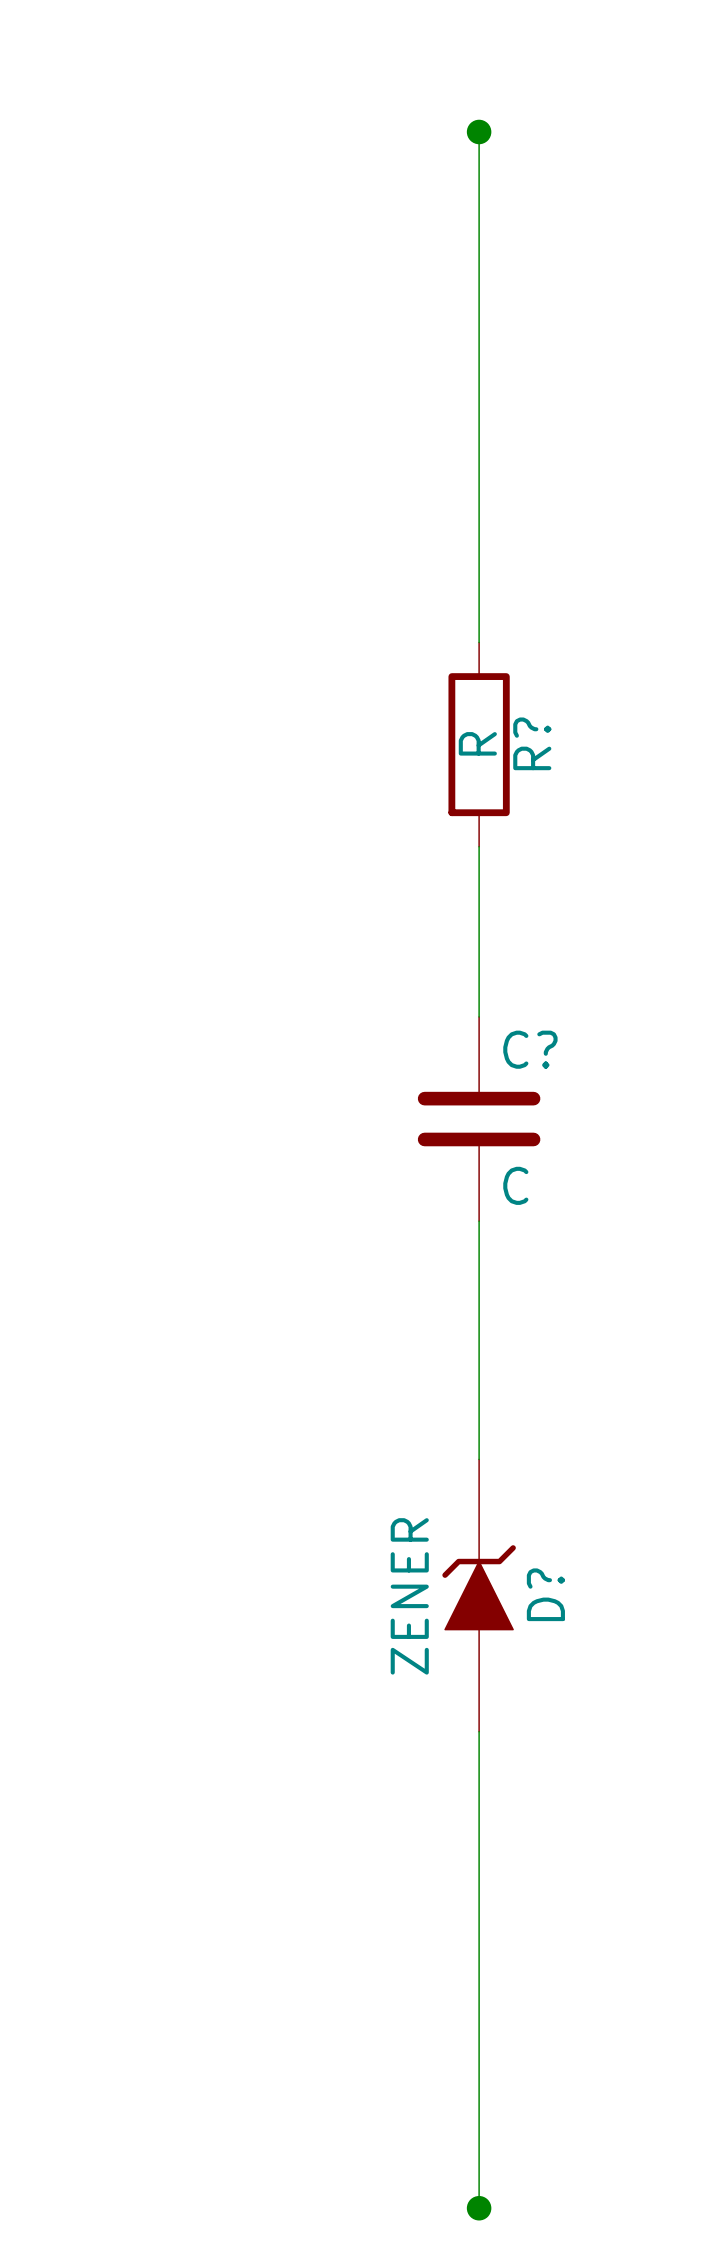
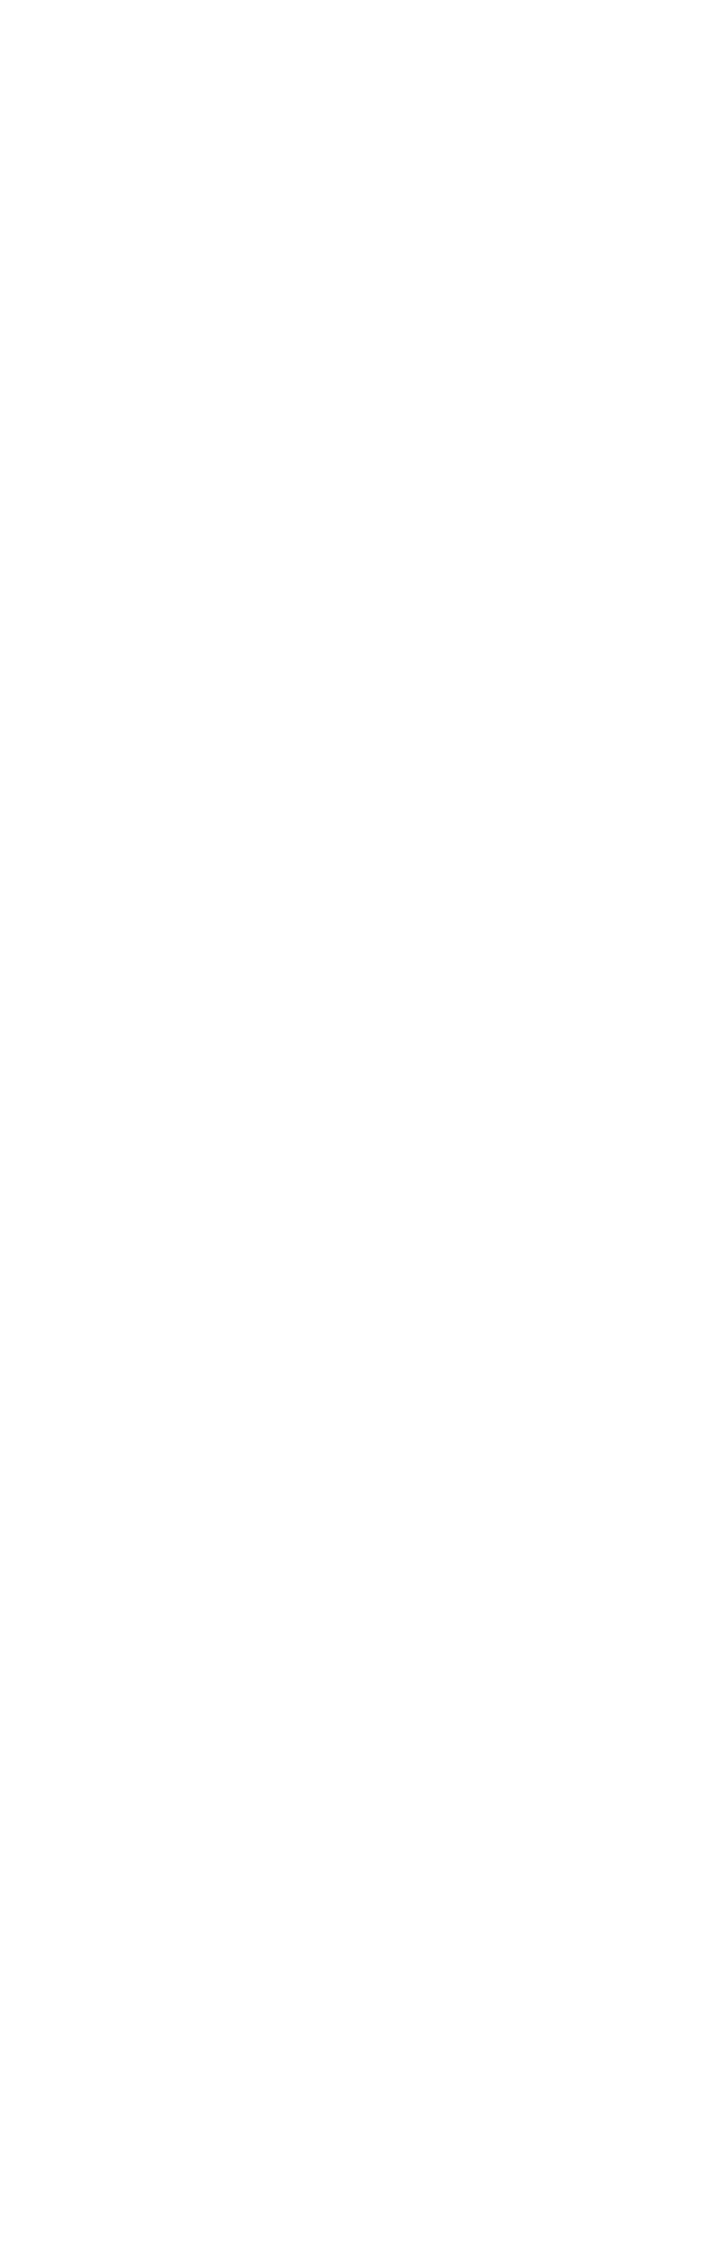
wire: (479, 131) (479, 642) -> none
junction: (479, 131) -> none
R?: R (479, 744) -> none
wire: (479, 846) (479, 1016) -> none
C?: C (479, 1119) -> none
wire: (479, 1221) (479, 1459) -> none
D?: ZENER (479, 1595) -> none
wire: (479, 1731) (479, 2208) -> none
junction: (479, 2208) -> none

